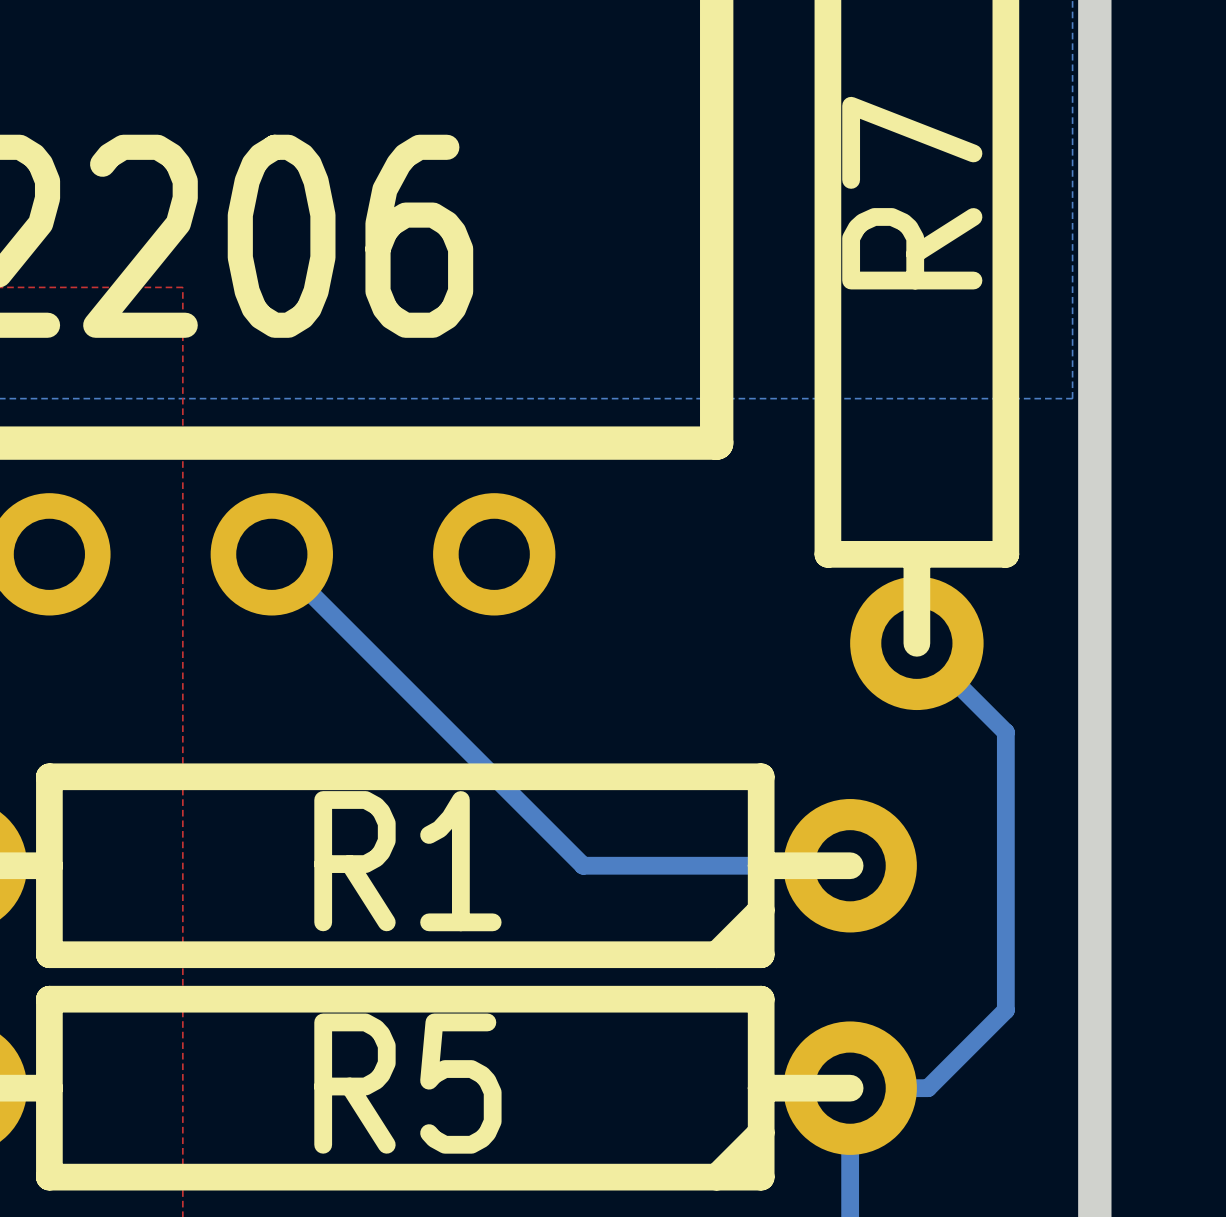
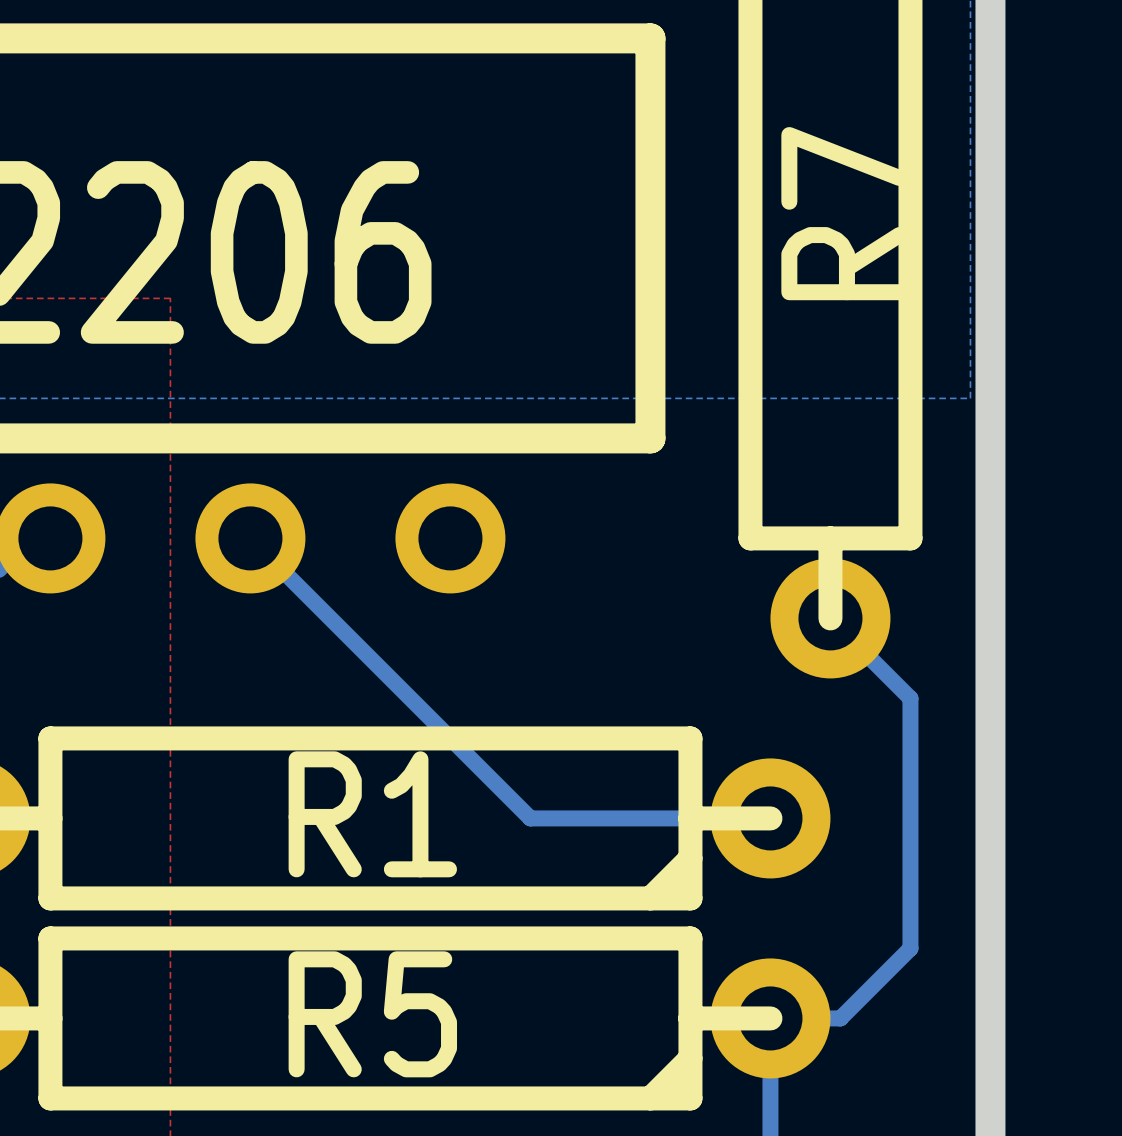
R7 name position: R7 (912, 193) -> R7 (844, 213)

